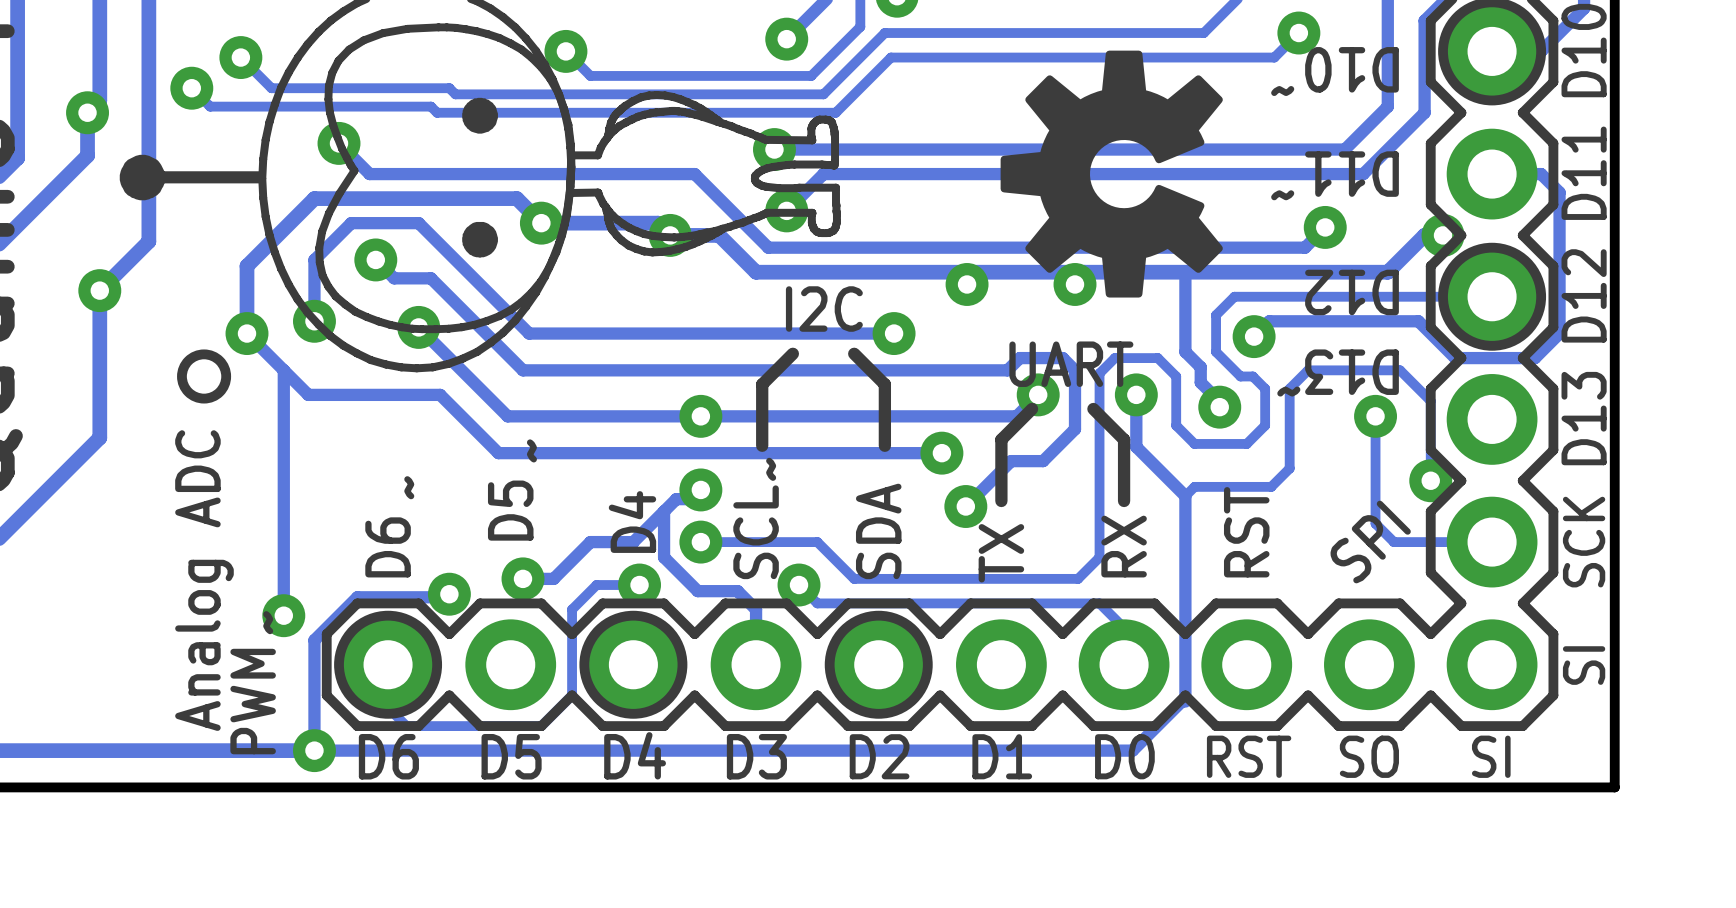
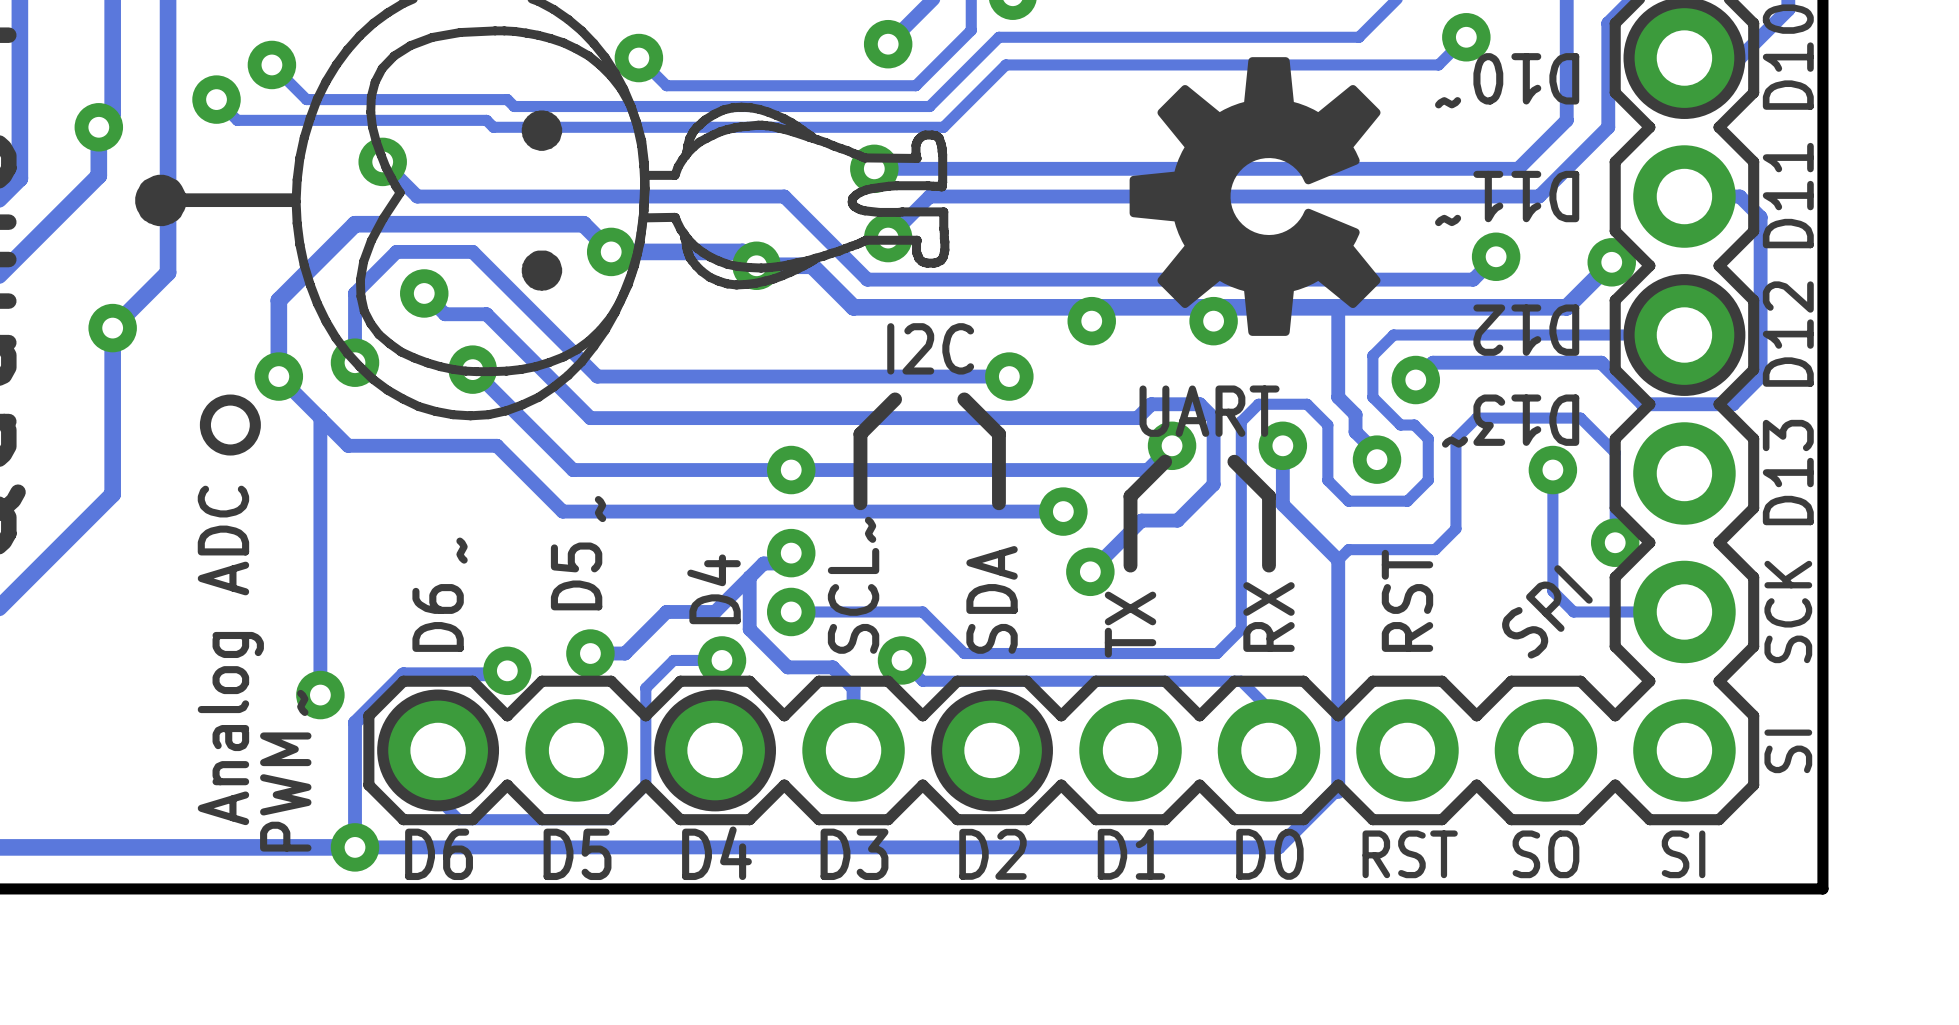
via position: (1443, 235) -> (1611, 262)

